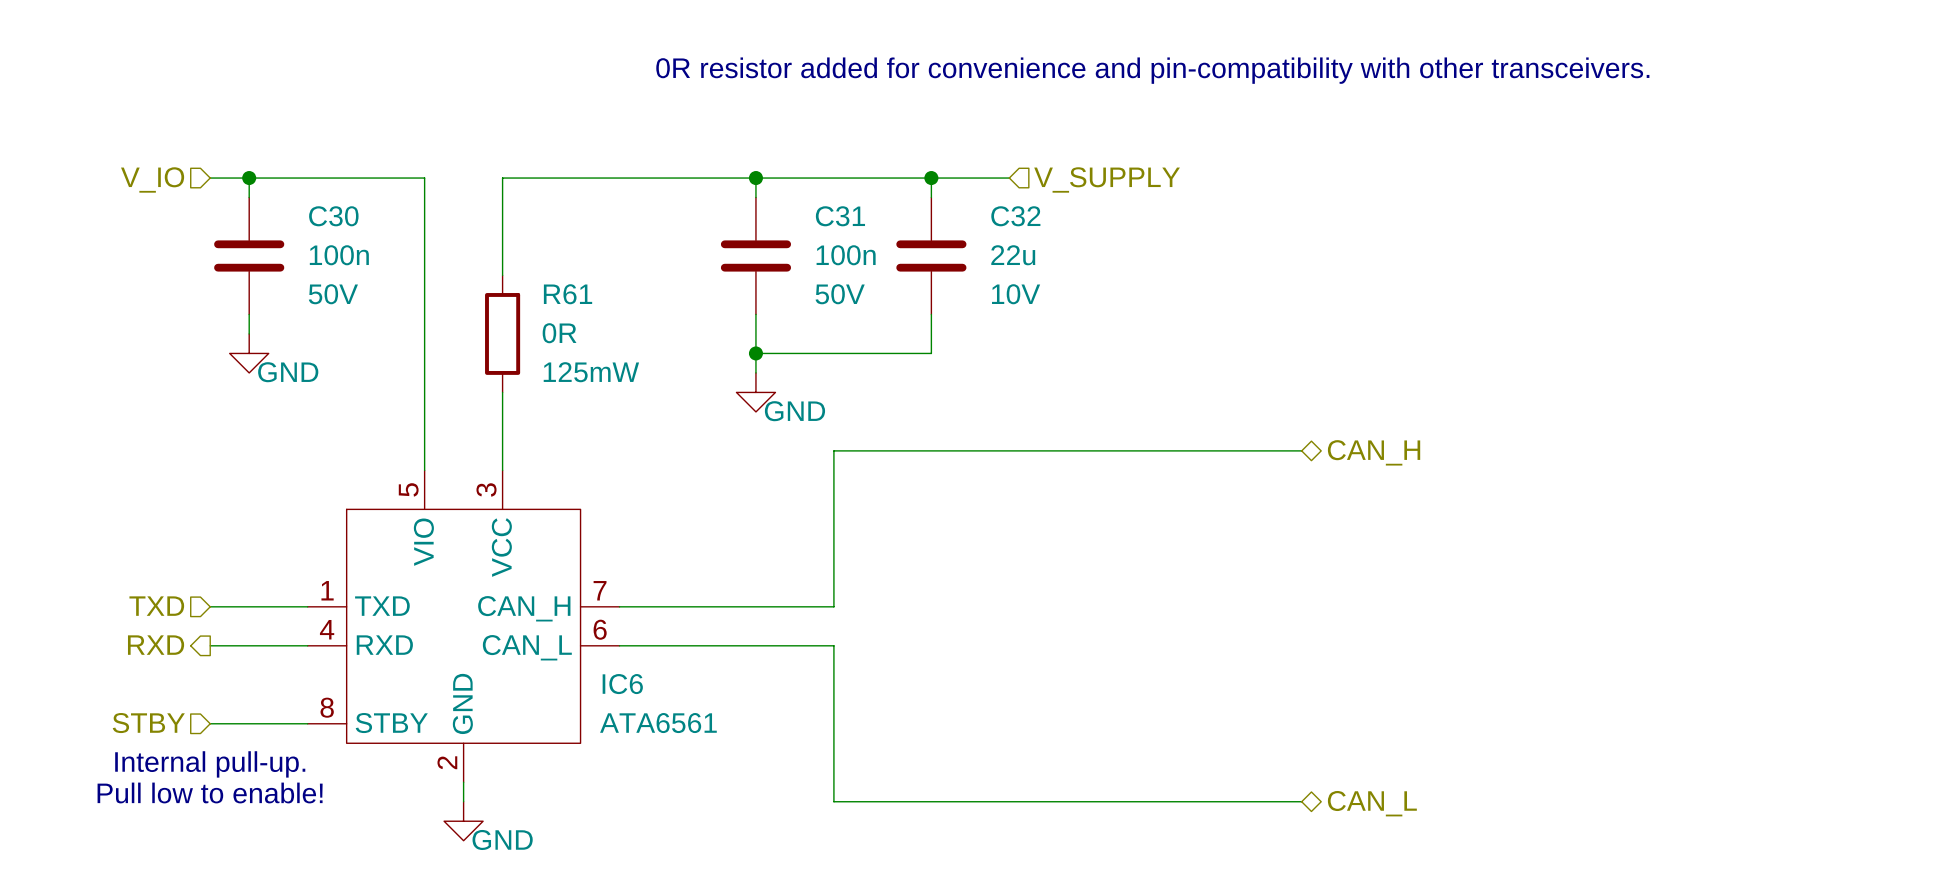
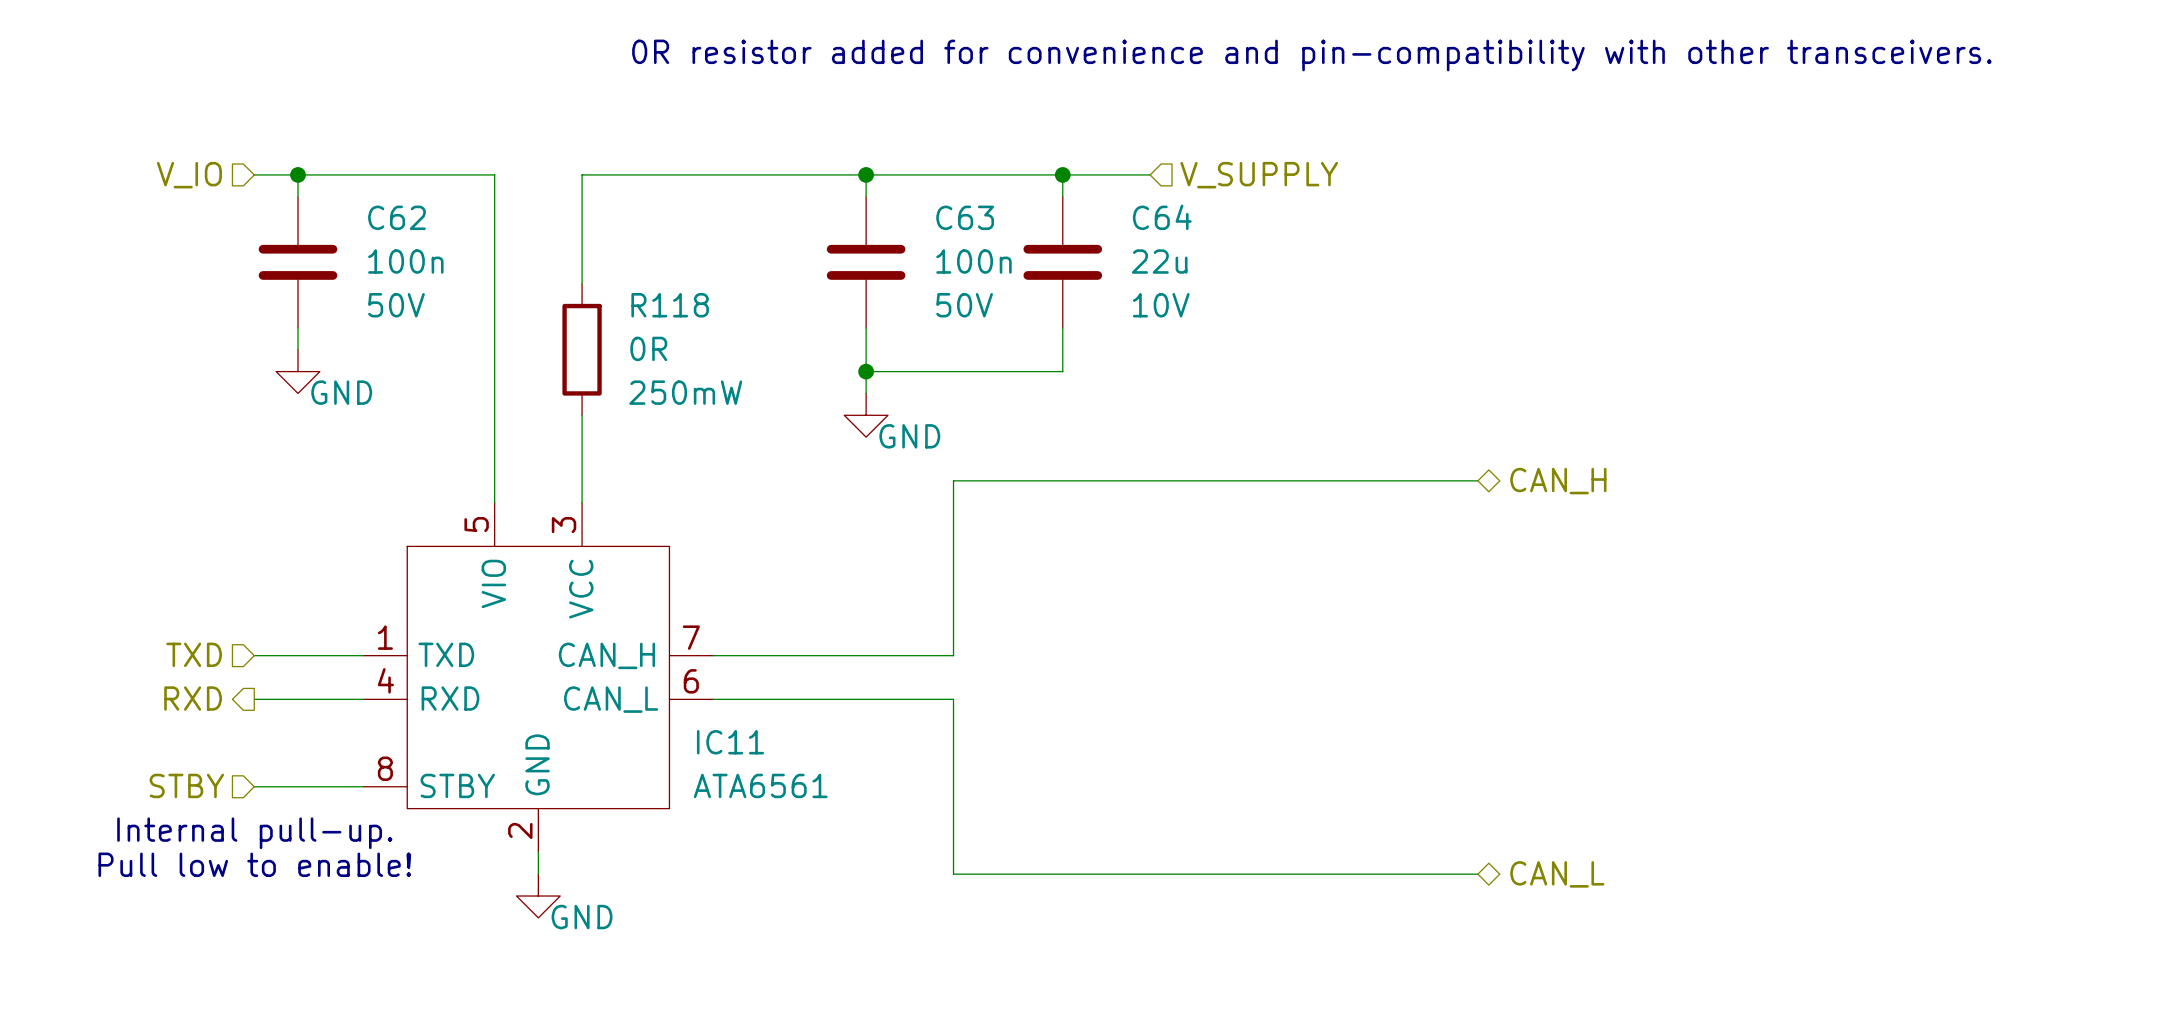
C30 name: C30 (333, 216) -> C62 (397, 217)
C31 name: C31 (840, 216) -> C63 (965, 217)
C32 name: C32 (1015, 216) -> C64 (1162, 217)
R61 name: R61 (568, 294) -> R118 (670, 305)
R61 text: 125mW (591, 372) -> 250mW (685, 392)
IC6 name: IC6 (622, 684) -> IC11 (730, 742)

